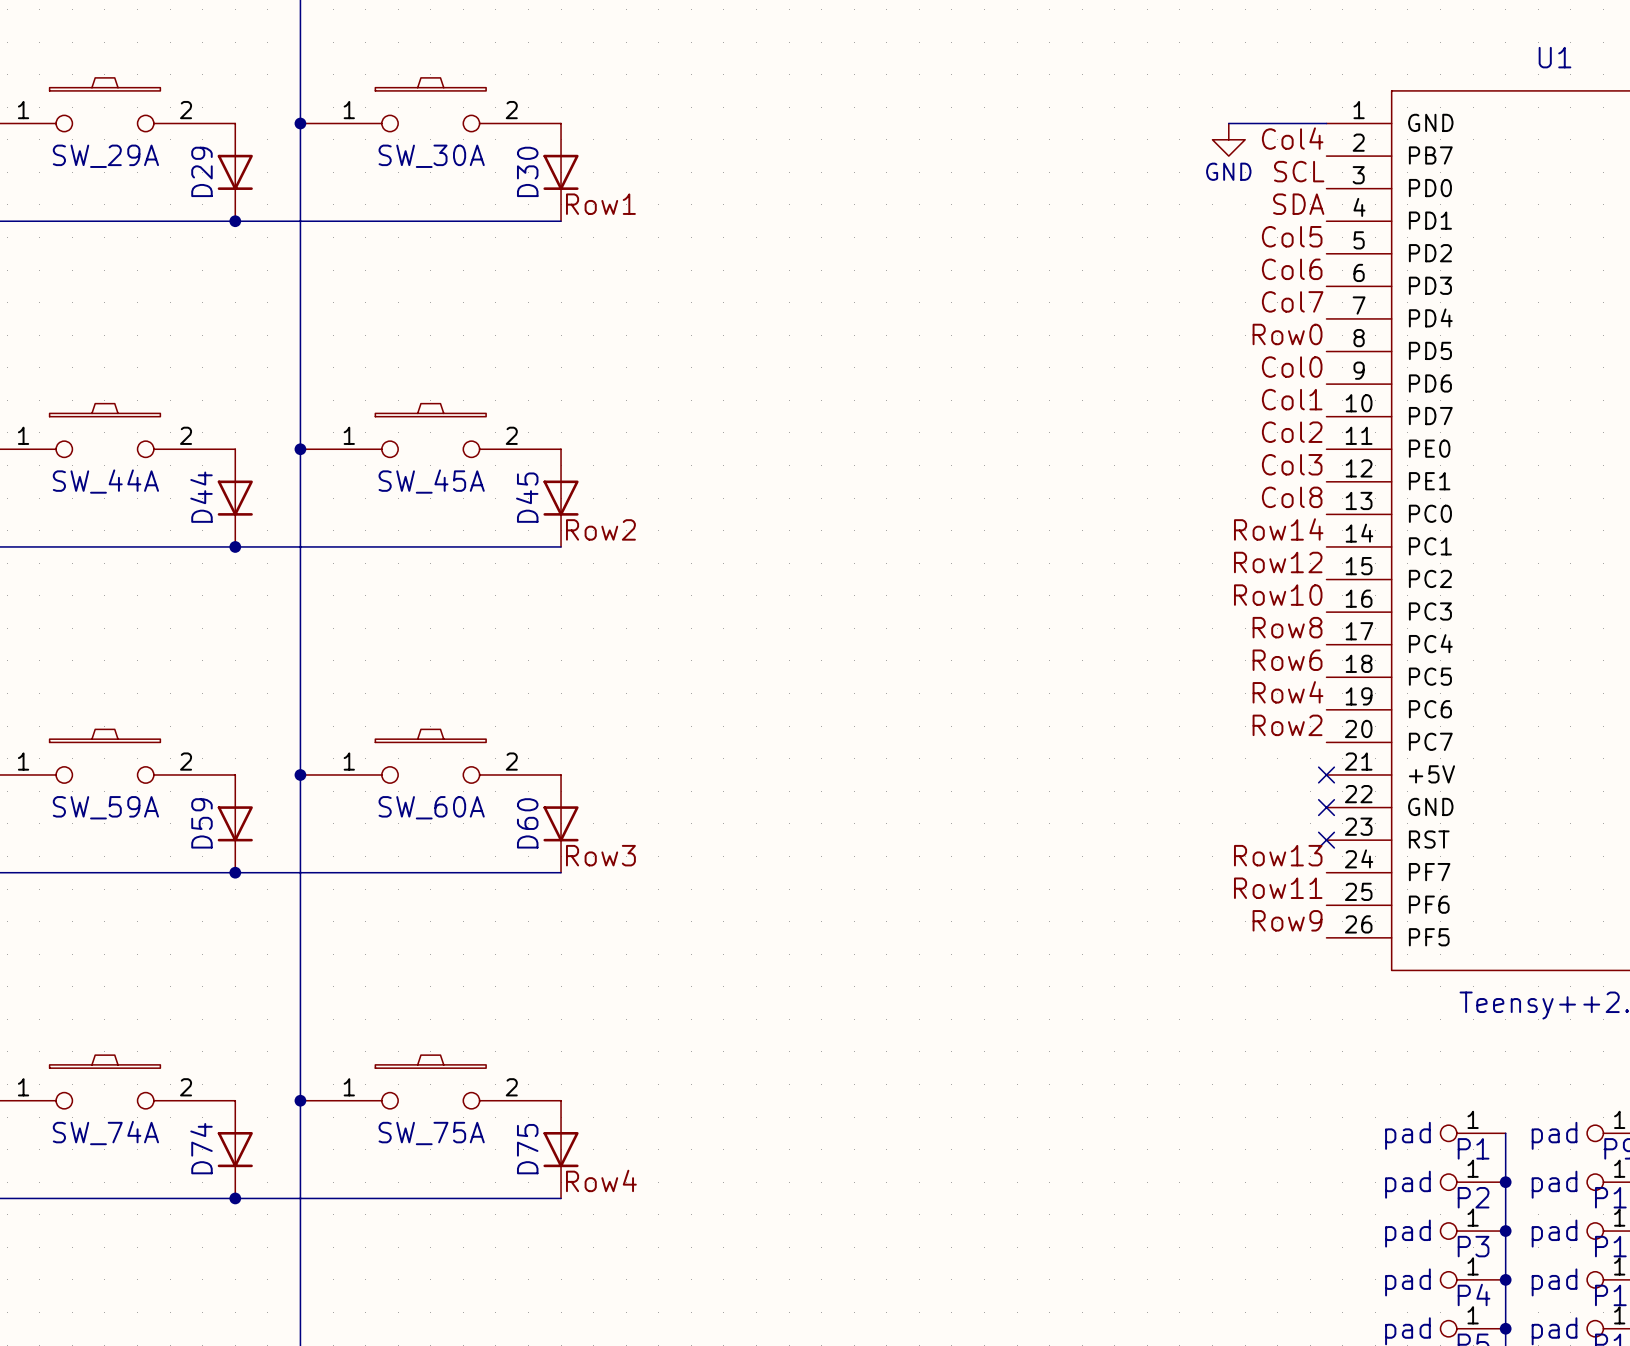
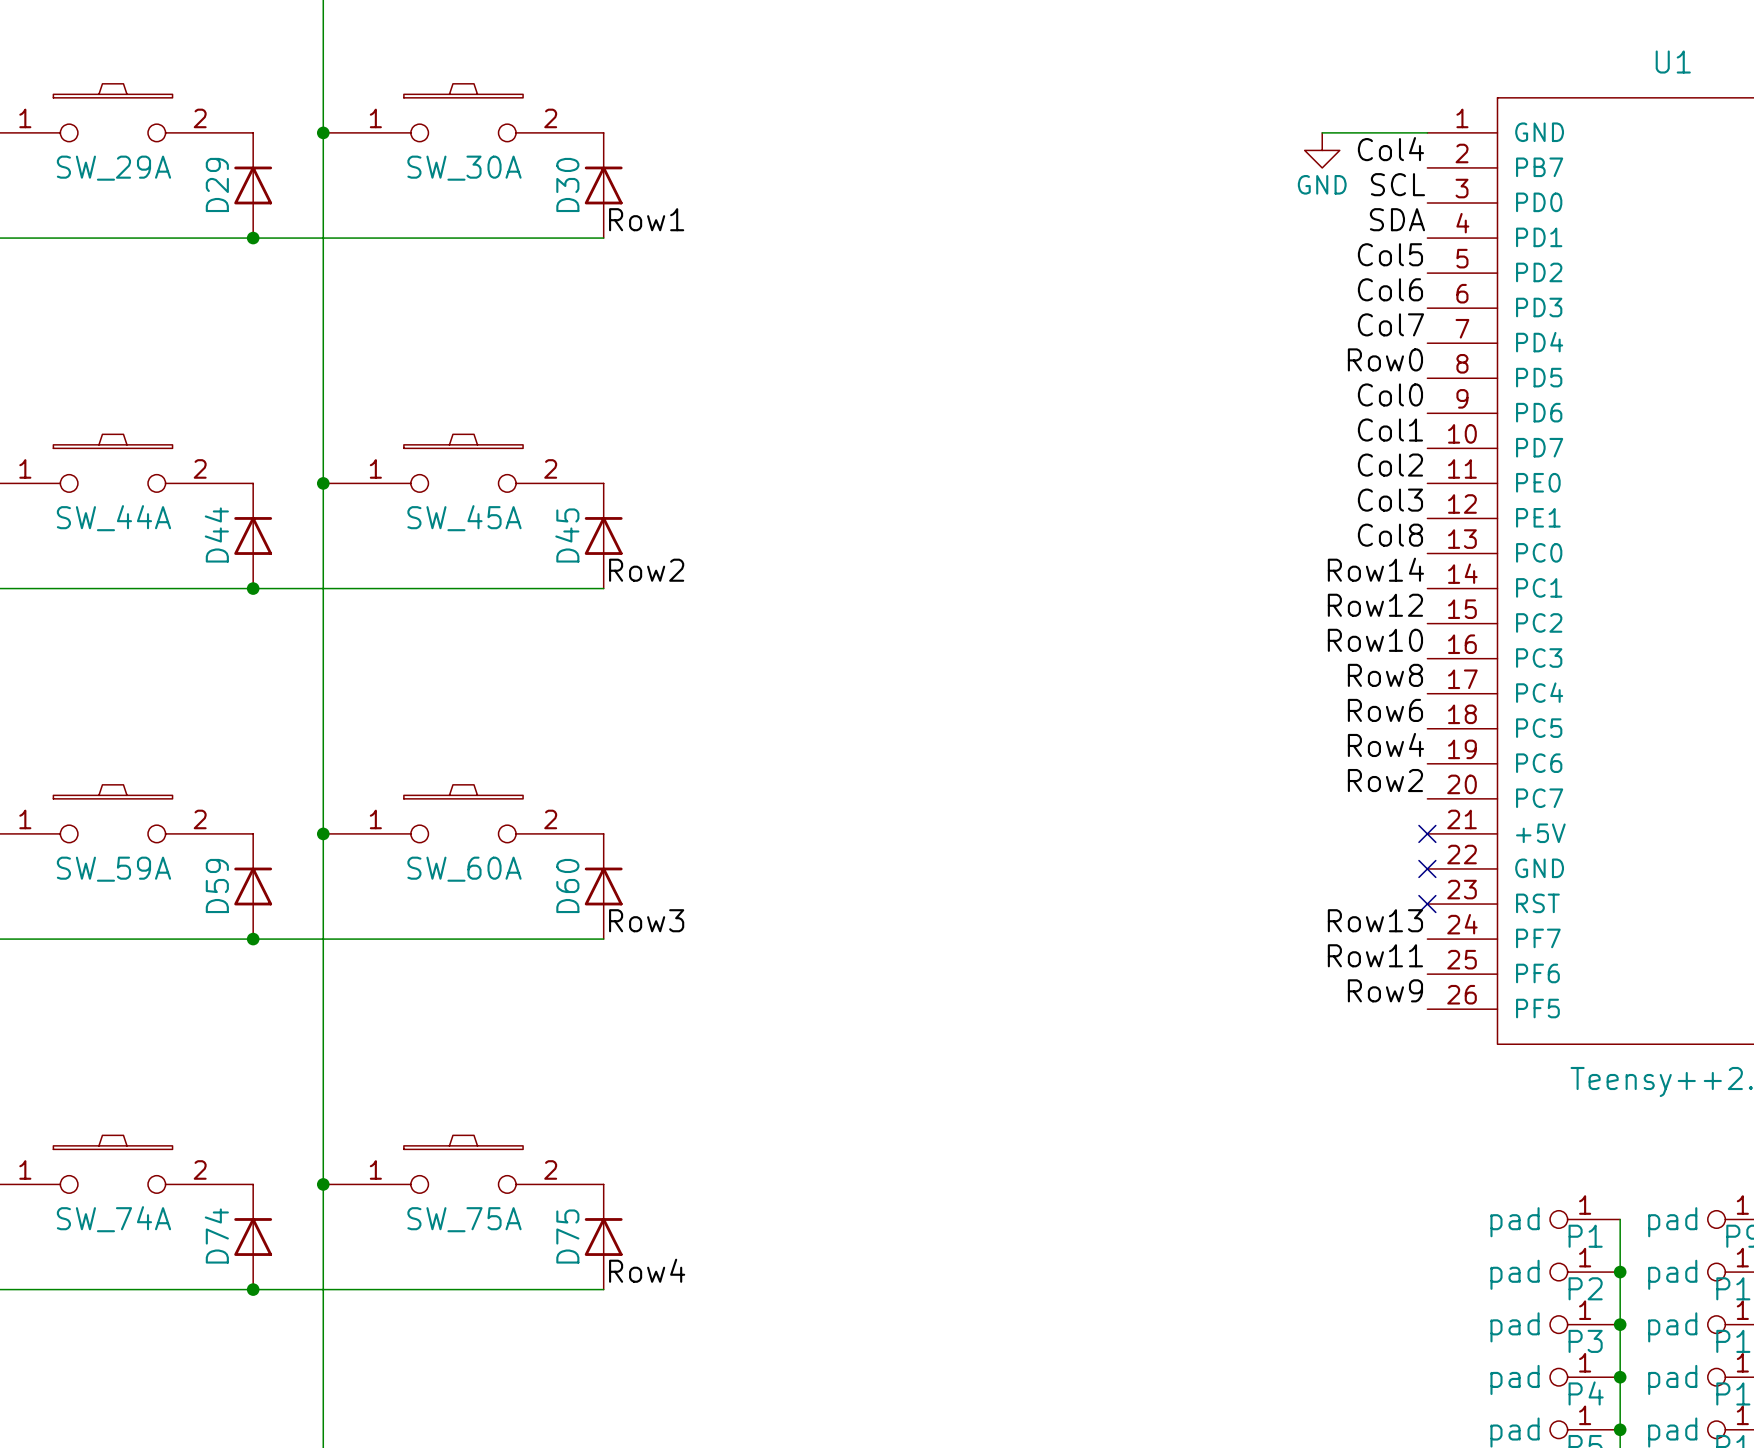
D29 rotation: 0° (235, 172) -> 180° (253, 185)
D30 rotation: 0° (561, 172) -> 180° (603, 185)
D44 rotation: 0° (235, 498) -> 180° (253, 535)
D45 rotation: 0° (561, 498) -> 180° (603, 535)
D59 rotation: 0° (235, 823) -> 180° (253, 886)
D60 rotation: 0° (561, 823) -> 180° (603, 886)
D74 rotation: 0° (235, 1149) -> 180° (253, 1237)
D75 rotation: 0° (561, 1149) -> 180° (603, 1237)

